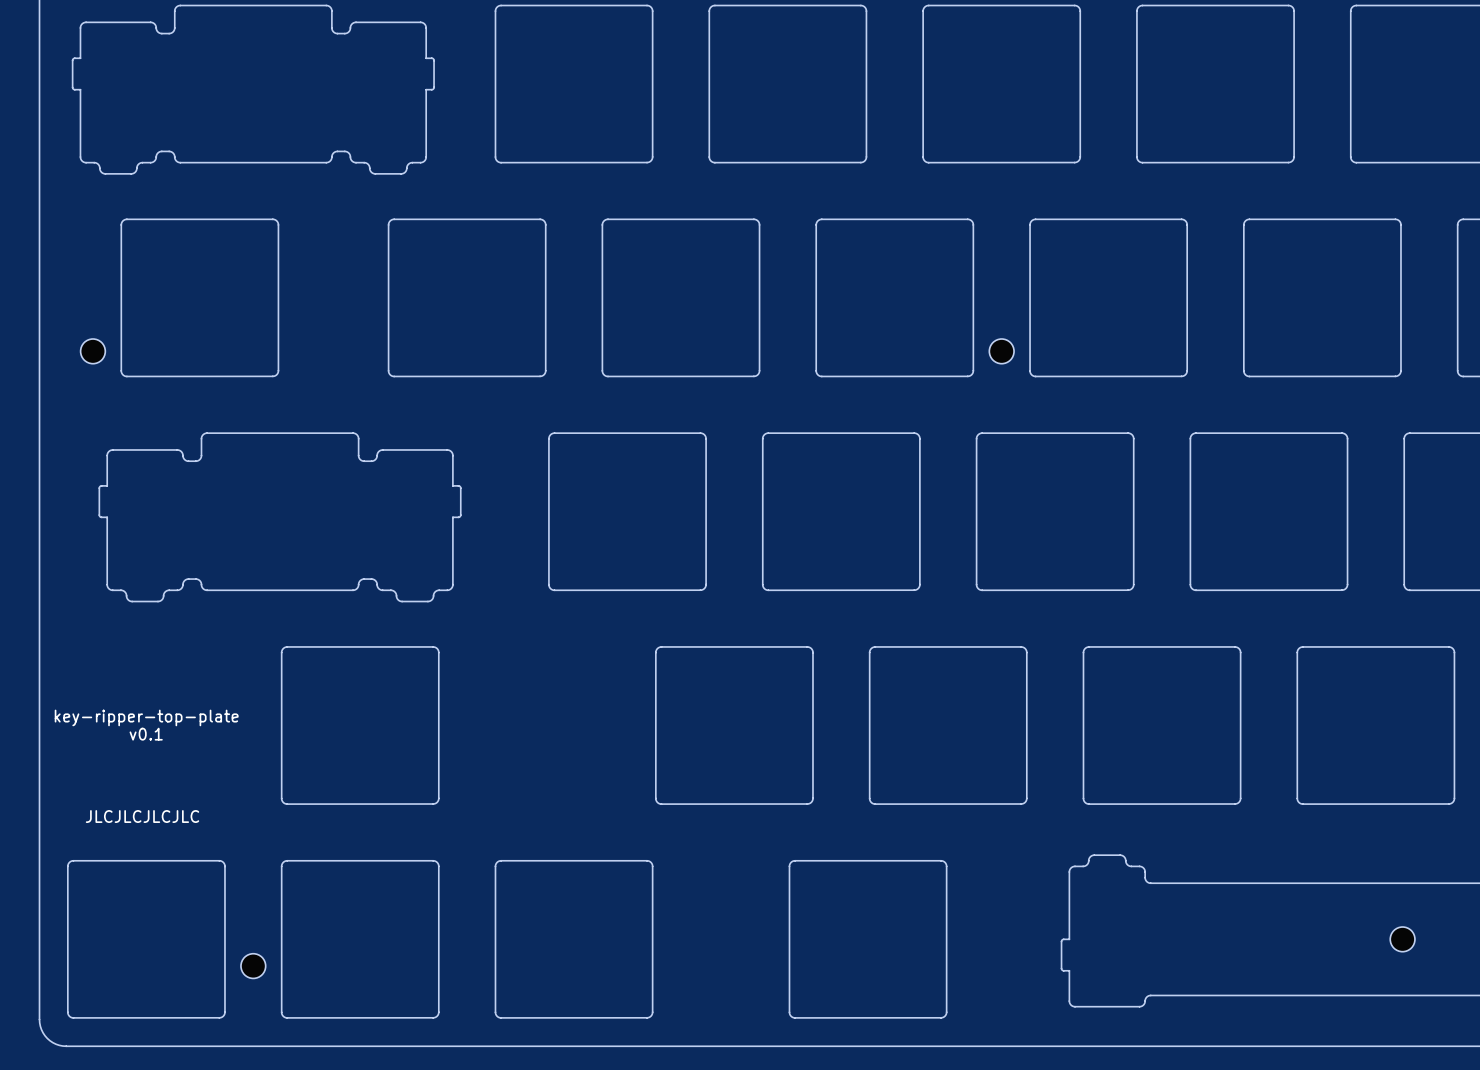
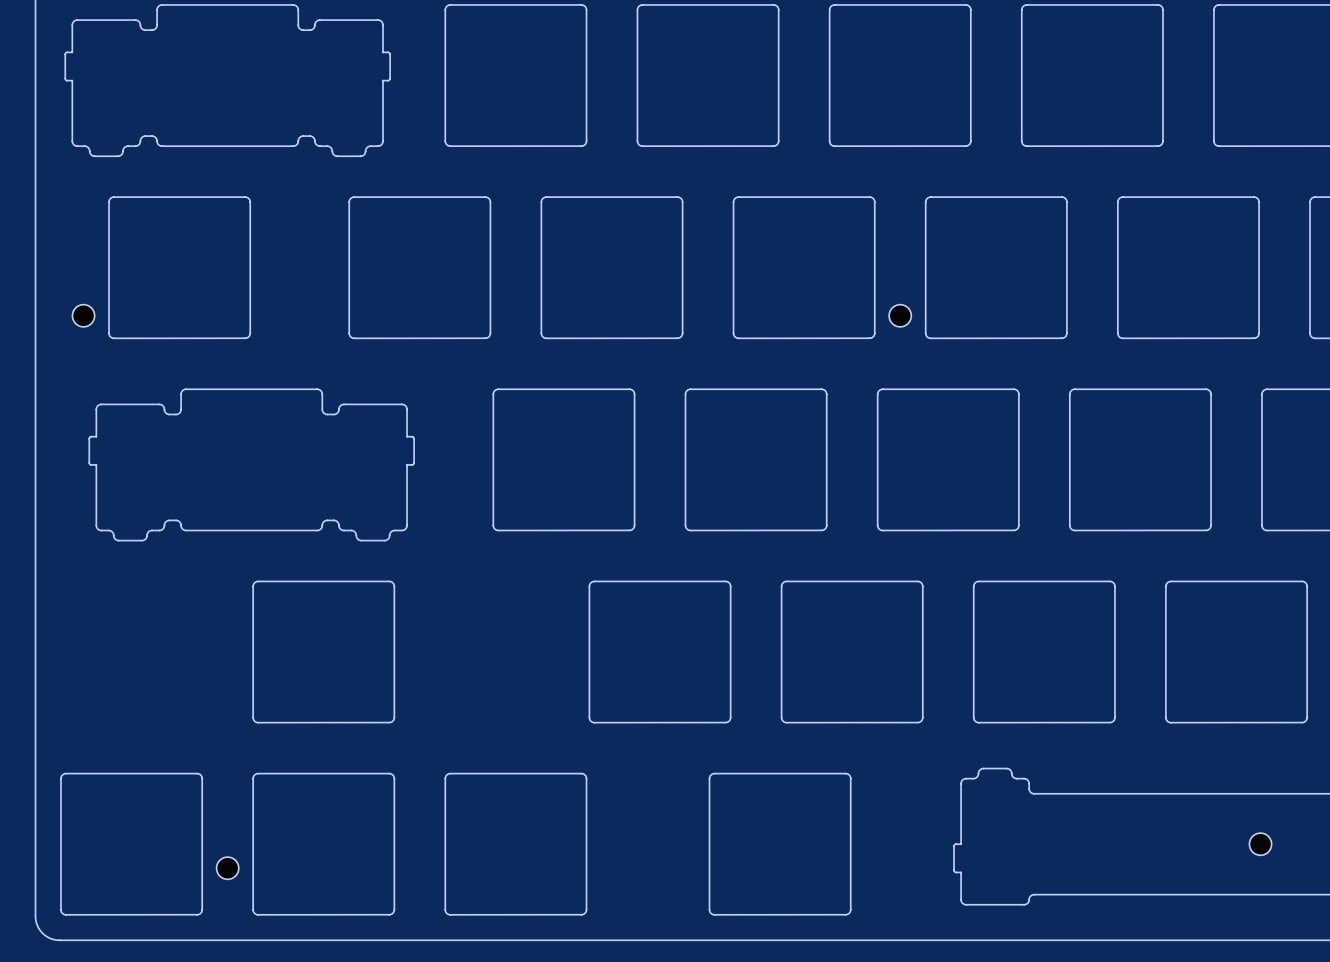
text: key-ripper-top-plate (146, 717) -> none
text: v0.1 (146, 734) -> none
text: JLCJLCJLCJLC (142, 816) -> none

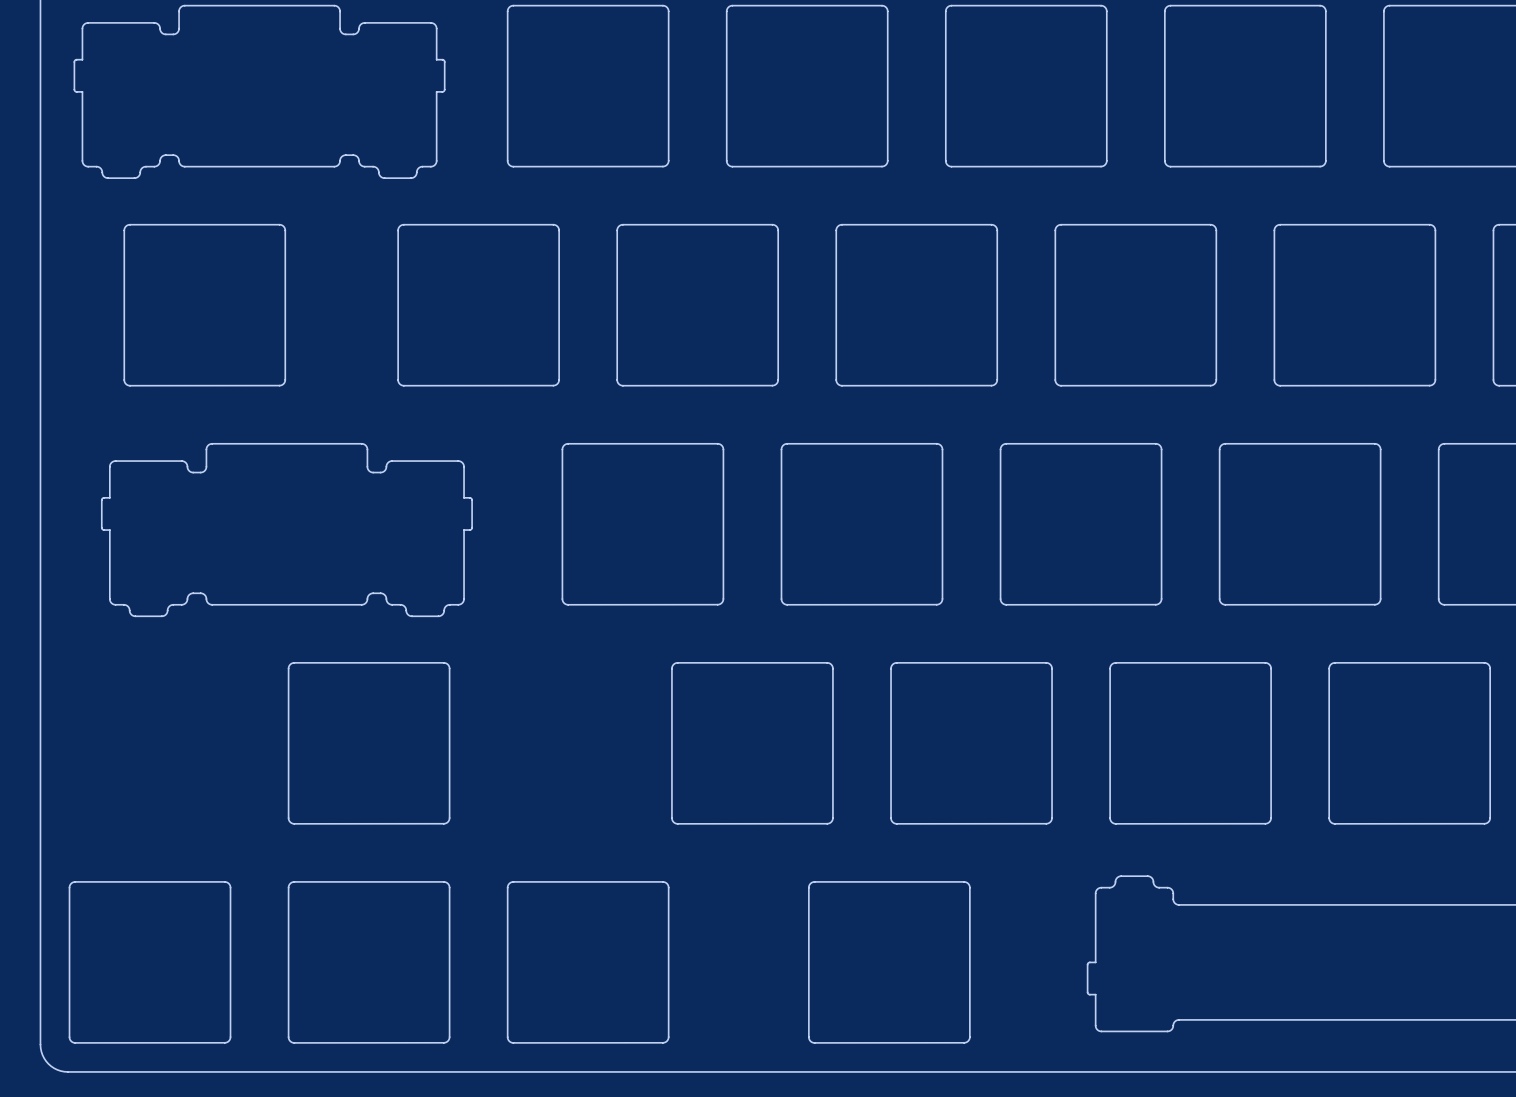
part: (83, 315) -> none
part: (900, 315) -> none
part: (1260, 844) -> none
part: (227, 868) -> none

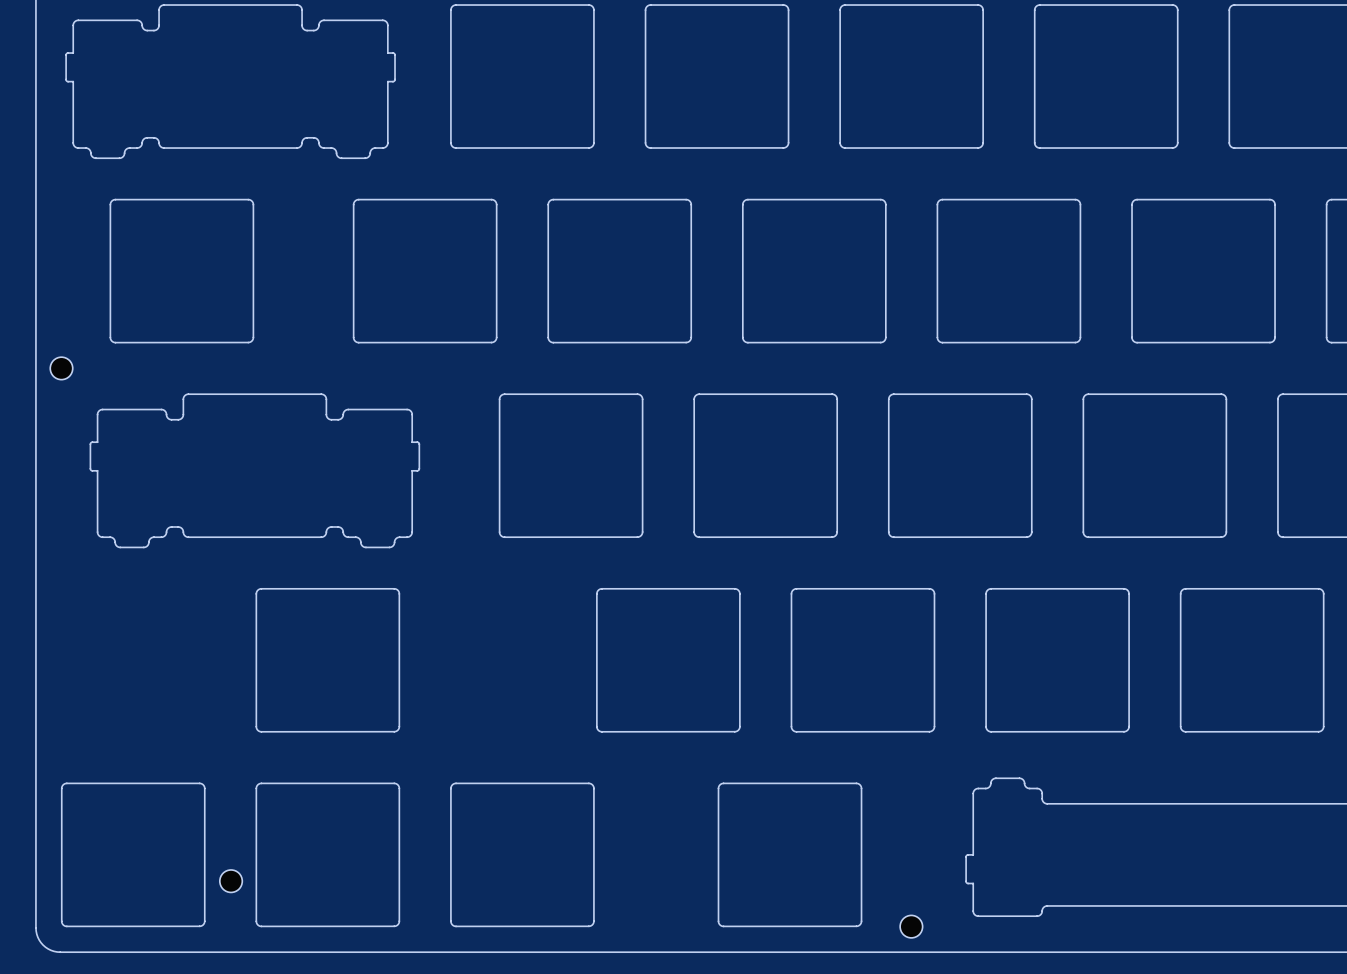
part: none -> (61, 368)
part: none -> (231, 881)
part: none -> (911, 926)

